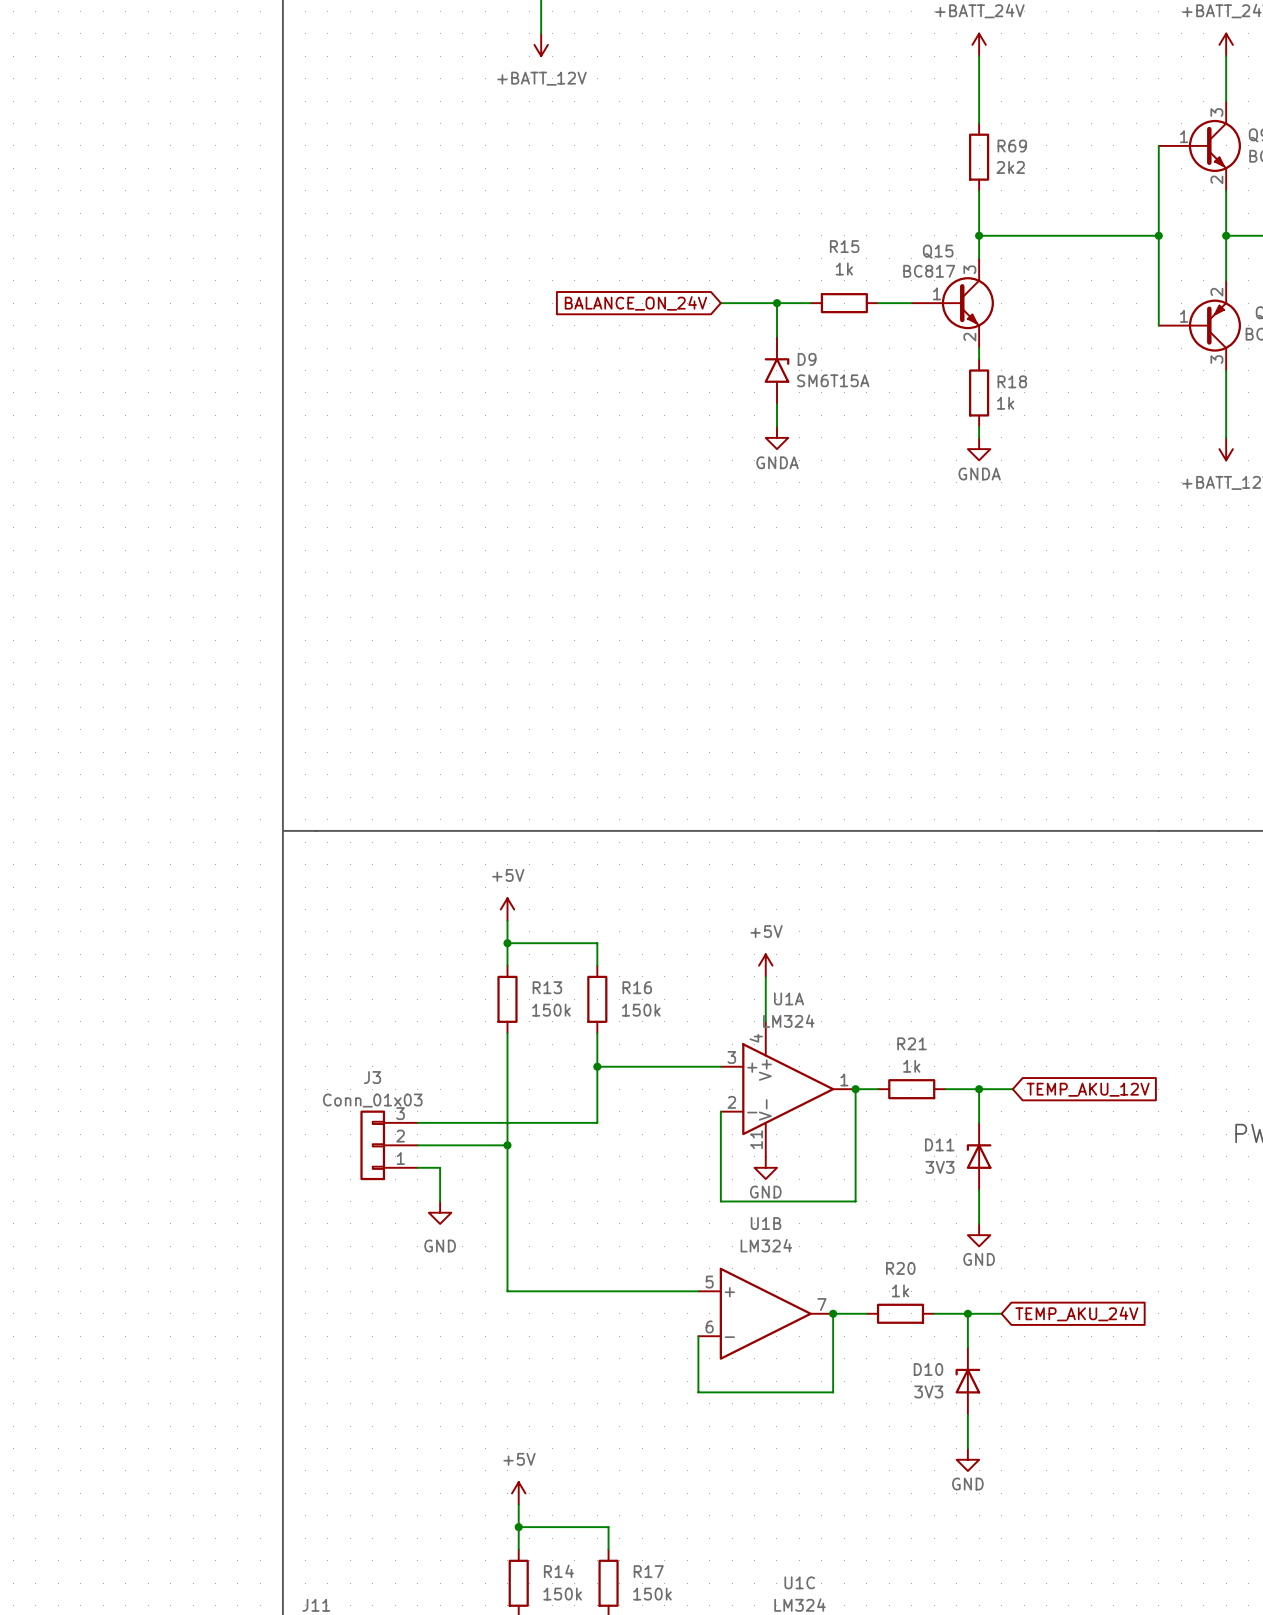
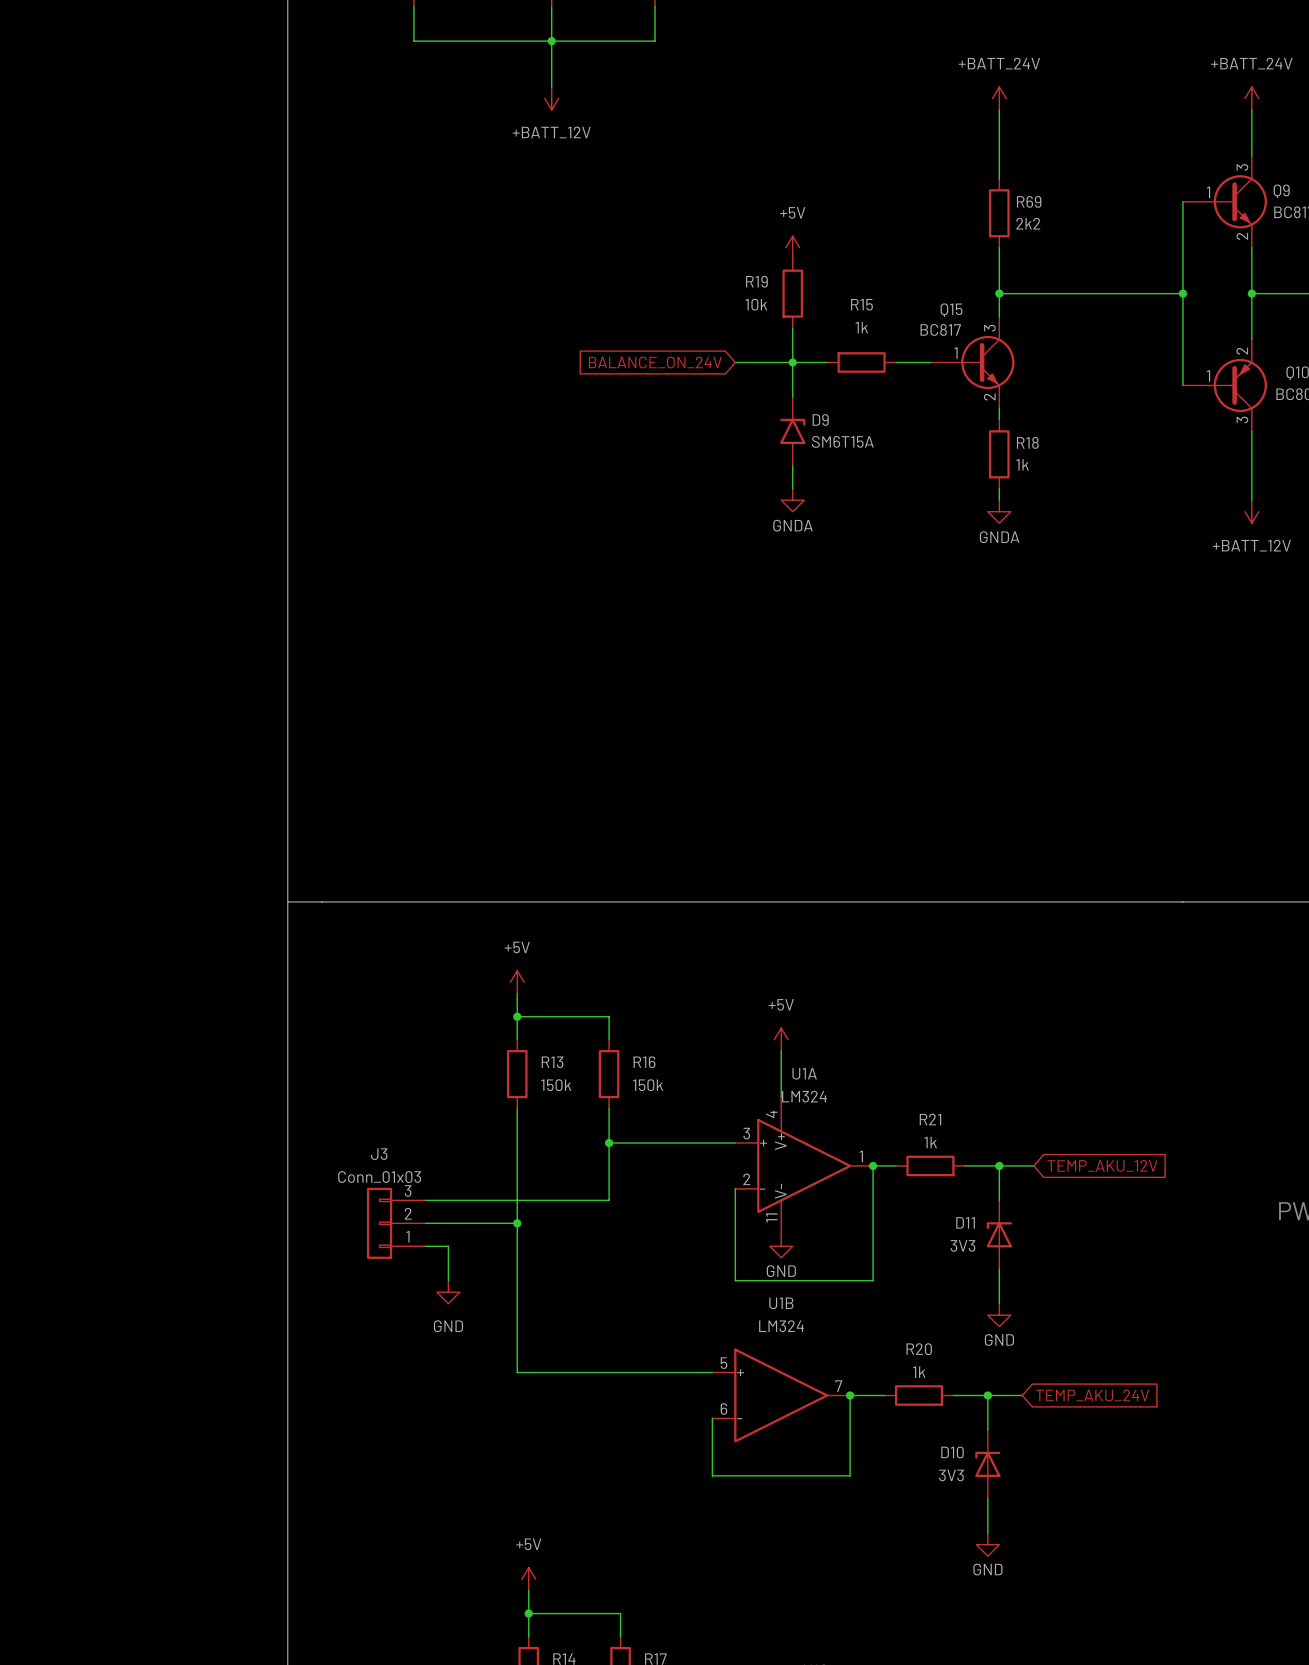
power symbol: none -> +5V (792, 247)
R19: none -> 10k (792, 293)
wire: none -> (792, 328) (792, 362)

